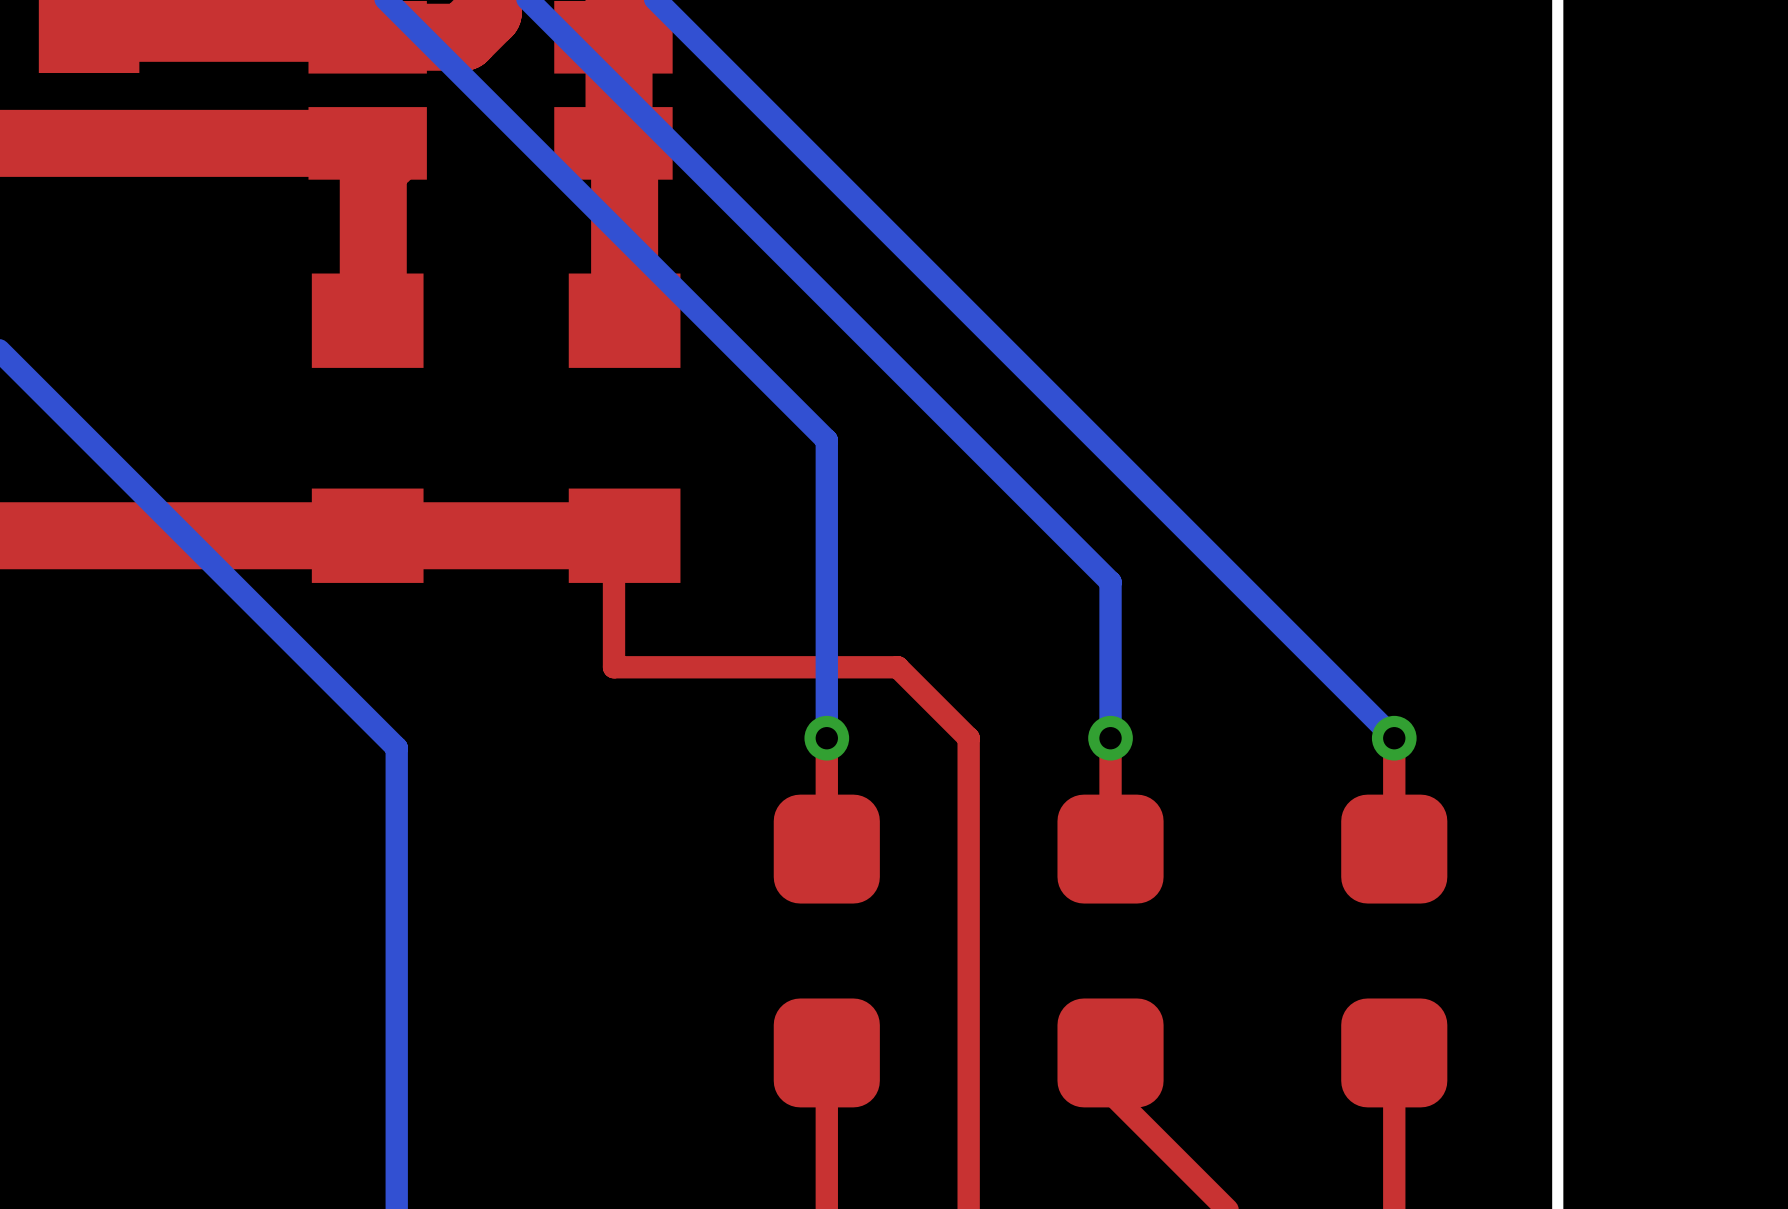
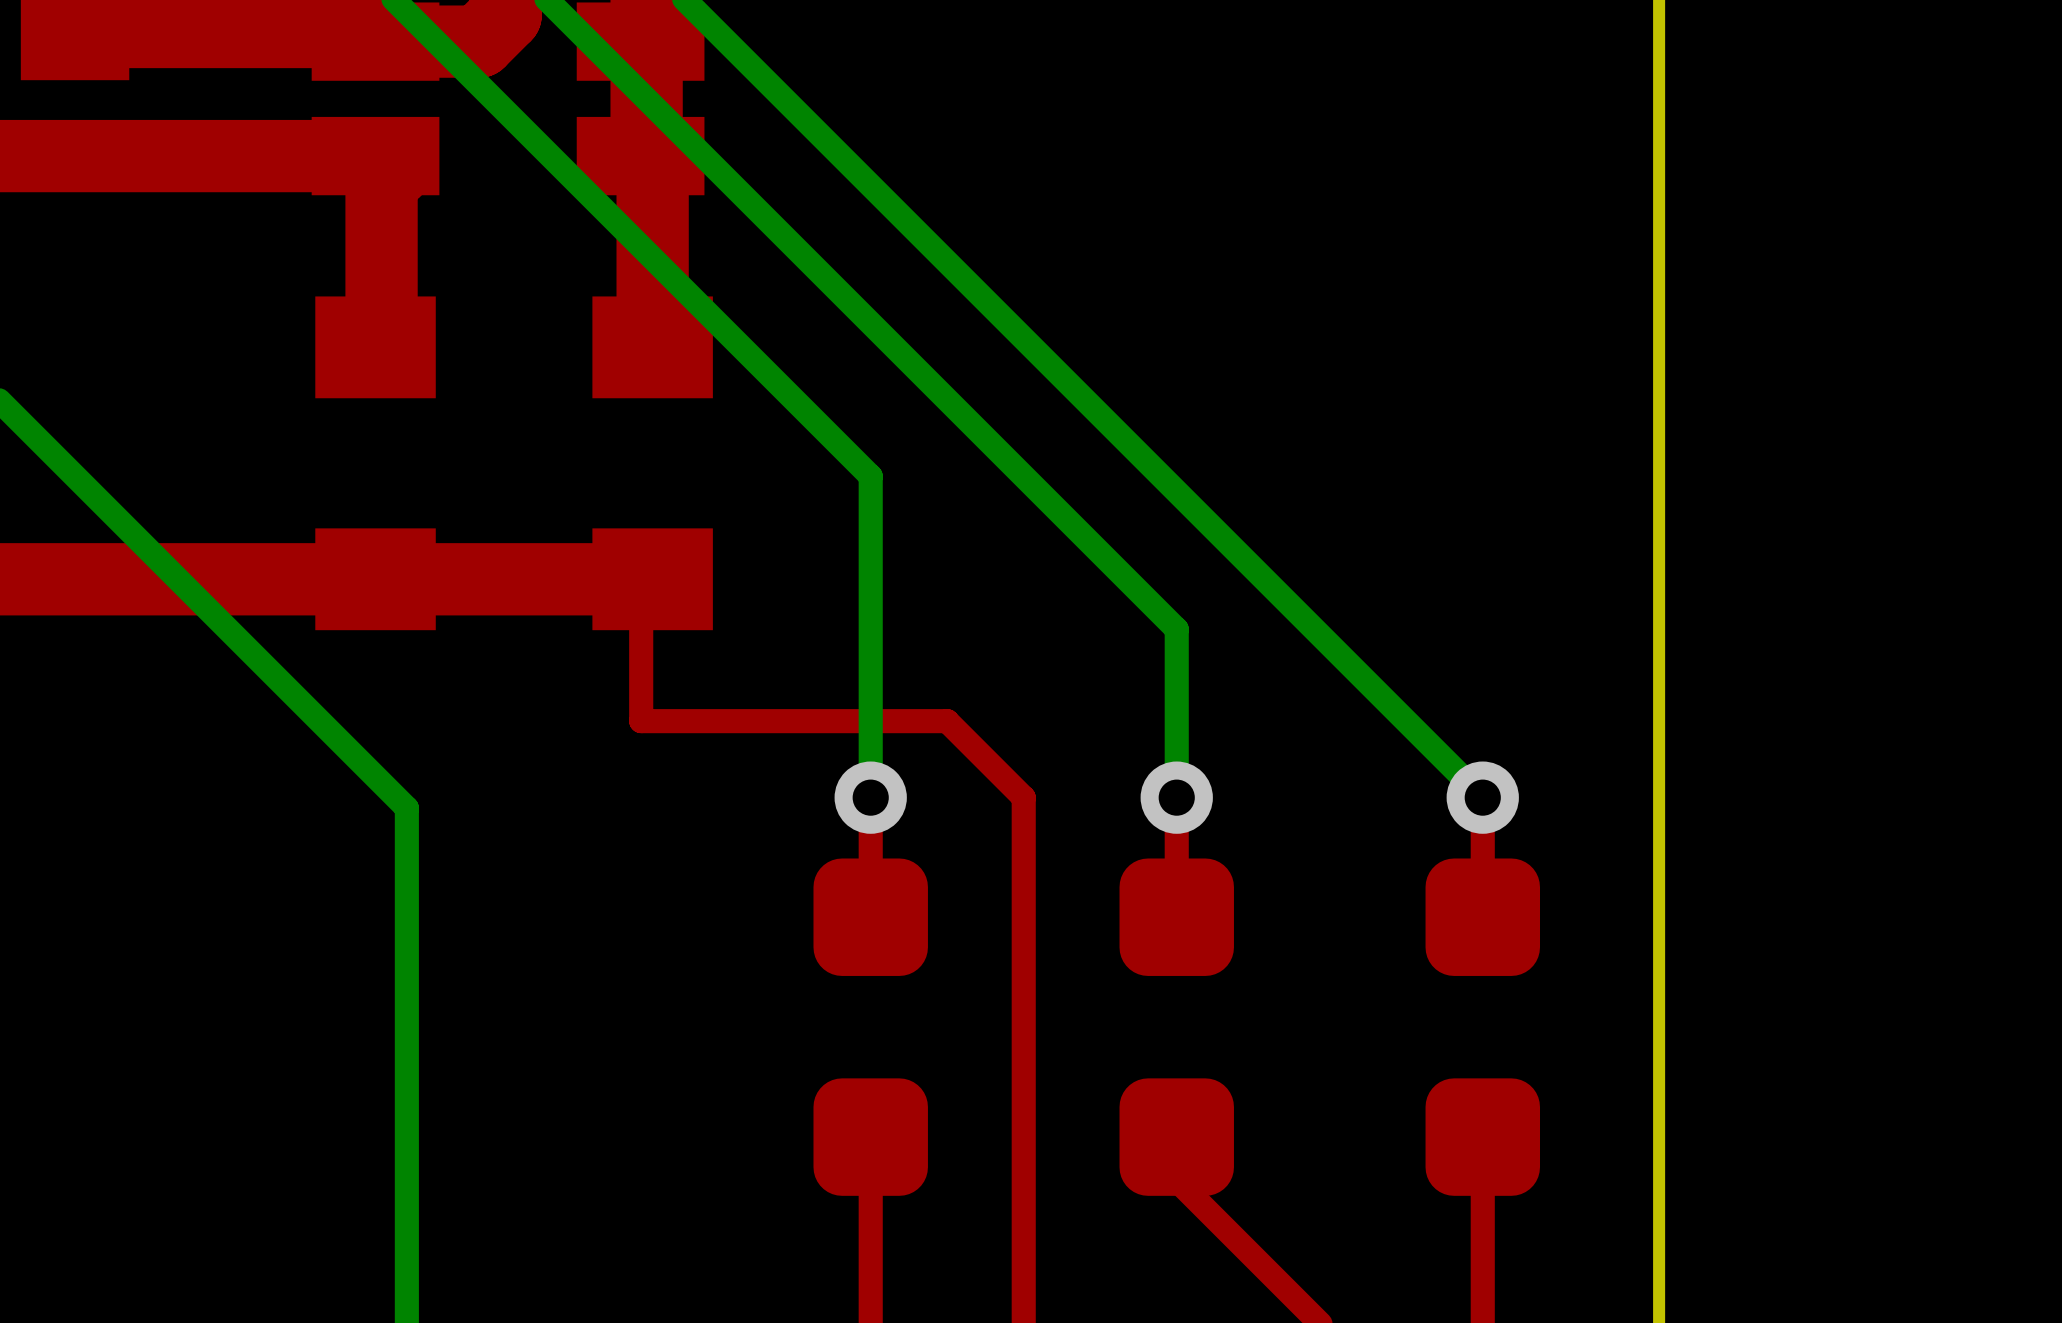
via size: [804, 715, 850, 761] -> [834, 761, 907, 834]
via size: [1088, 715, 1133, 761] -> [1140, 761, 1213, 834]
via size: [1371, 715, 1417, 761] -> [1446, 761, 1519, 834]

